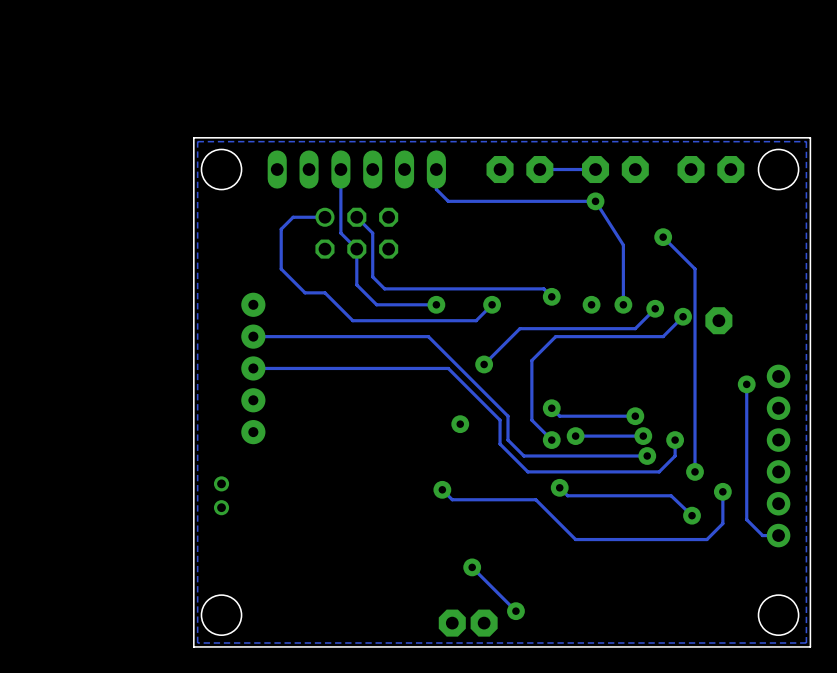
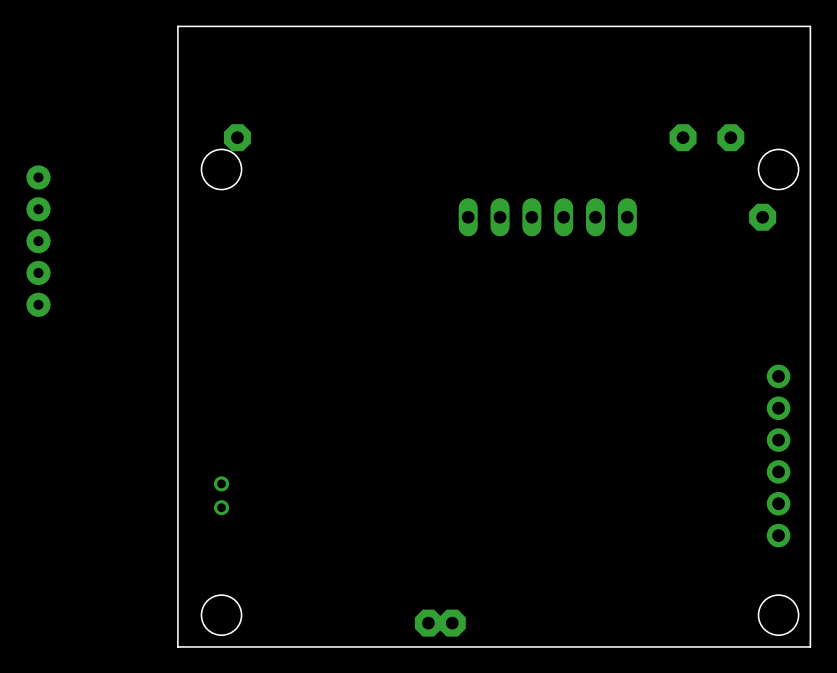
part: none -> (237, 137)
part: none -> (683, 137)
part: none -> (730, 137)
board edge: (810, 137) (193, 137) (193, 646) -> (810, 137) (810, 26) (177, 26) (177, 646) (193, 646)
zone outline: (806, 141) (197, 141) (197, 642) (806, 642) (806, 141) -> none
track: (340, 169) (340, 233) (356, 249) (356, 284) (376, 304) (436, 304) -> none
part position: (356, 169) -> (547, 217)
track: (436, 169) (436, 189) (448, 201) (595, 201) (623, 245) (623, 304) -> none
part: (500, 169) -> none
part: (539, 169) -> none
track: (595, 169) (539, 169) -> none
part: (595, 169) -> none
part: (635, 169) -> none
part: (691, 169) -> none
part: (730, 169) -> none
via: (595, 201) -> none
track: (324, 217) (293, 217) (281, 229) (281, 268) (305, 292) (324, 292) (352, 320) (476, 320) (492, 304) -> none
track: (356, 217) (372, 233) (372, 276) (384, 288) (543, 288) (551, 296) -> none
part: none -> (762, 217)
part: (356, 233) -> none
track: (663, 237) (695, 268) (695, 471) -> none
via: (663, 237) -> none
via: (551, 296) -> none
via: (436, 304) -> none
via: (492, 304) -> none
via: (591, 304) -> none
via: (623, 304) -> none
track: (655, 308) (635, 328) (519, 328) (484, 364) -> none
via: (655, 308) -> none
track: (683, 316) (663, 336) (555, 336) (531, 360) (531, 420) (551, 440) -> none
via: (683, 316) -> none
part: (718, 320) -> none
track: (253, 336) (428, 336) (508, 416) (508, 440) (523, 455) (647, 455) -> none
via: (484, 364) -> none
track: (253, 368) (448, 368) (500, 420) (500, 444) (527, 471) (659, 471) (675, 455) (675, 440) -> none
part position: (253, 368) -> (38, 241)
track: (746, 384) (746, 519) (762, 535) (778, 535) -> none
via: (746, 384) -> none
track: (551, 408) (559, 416) (635, 416) -> none
via: (551, 408) -> none
via: (635, 416) -> none
via: (460, 424) -> none
via: (575, 436) -> none
track: (643, 436) (575, 436) -> none
via: (643, 436) -> none
via: (551, 440) -> none
via: (675, 440) -> none
via: (647, 455) -> none
via: (695, 471) -> none
track: (559, 487) (567, 495) (671, 495) (692, 515) -> none
via: (559, 487) -> none
track: (442, 489) (452, 499) (535, 499) (575, 539) (706, 539) (722, 523) (722, 491) -> none
via: (442, 489) -> none
via: (722, 491) -> none
via: (692, 515) -> none
track: (472, 567) (515, 611) -> none
via: (472, 567) -> none
via: (515, 611) -> none
part position: (484, 623) -> (428, 623)

